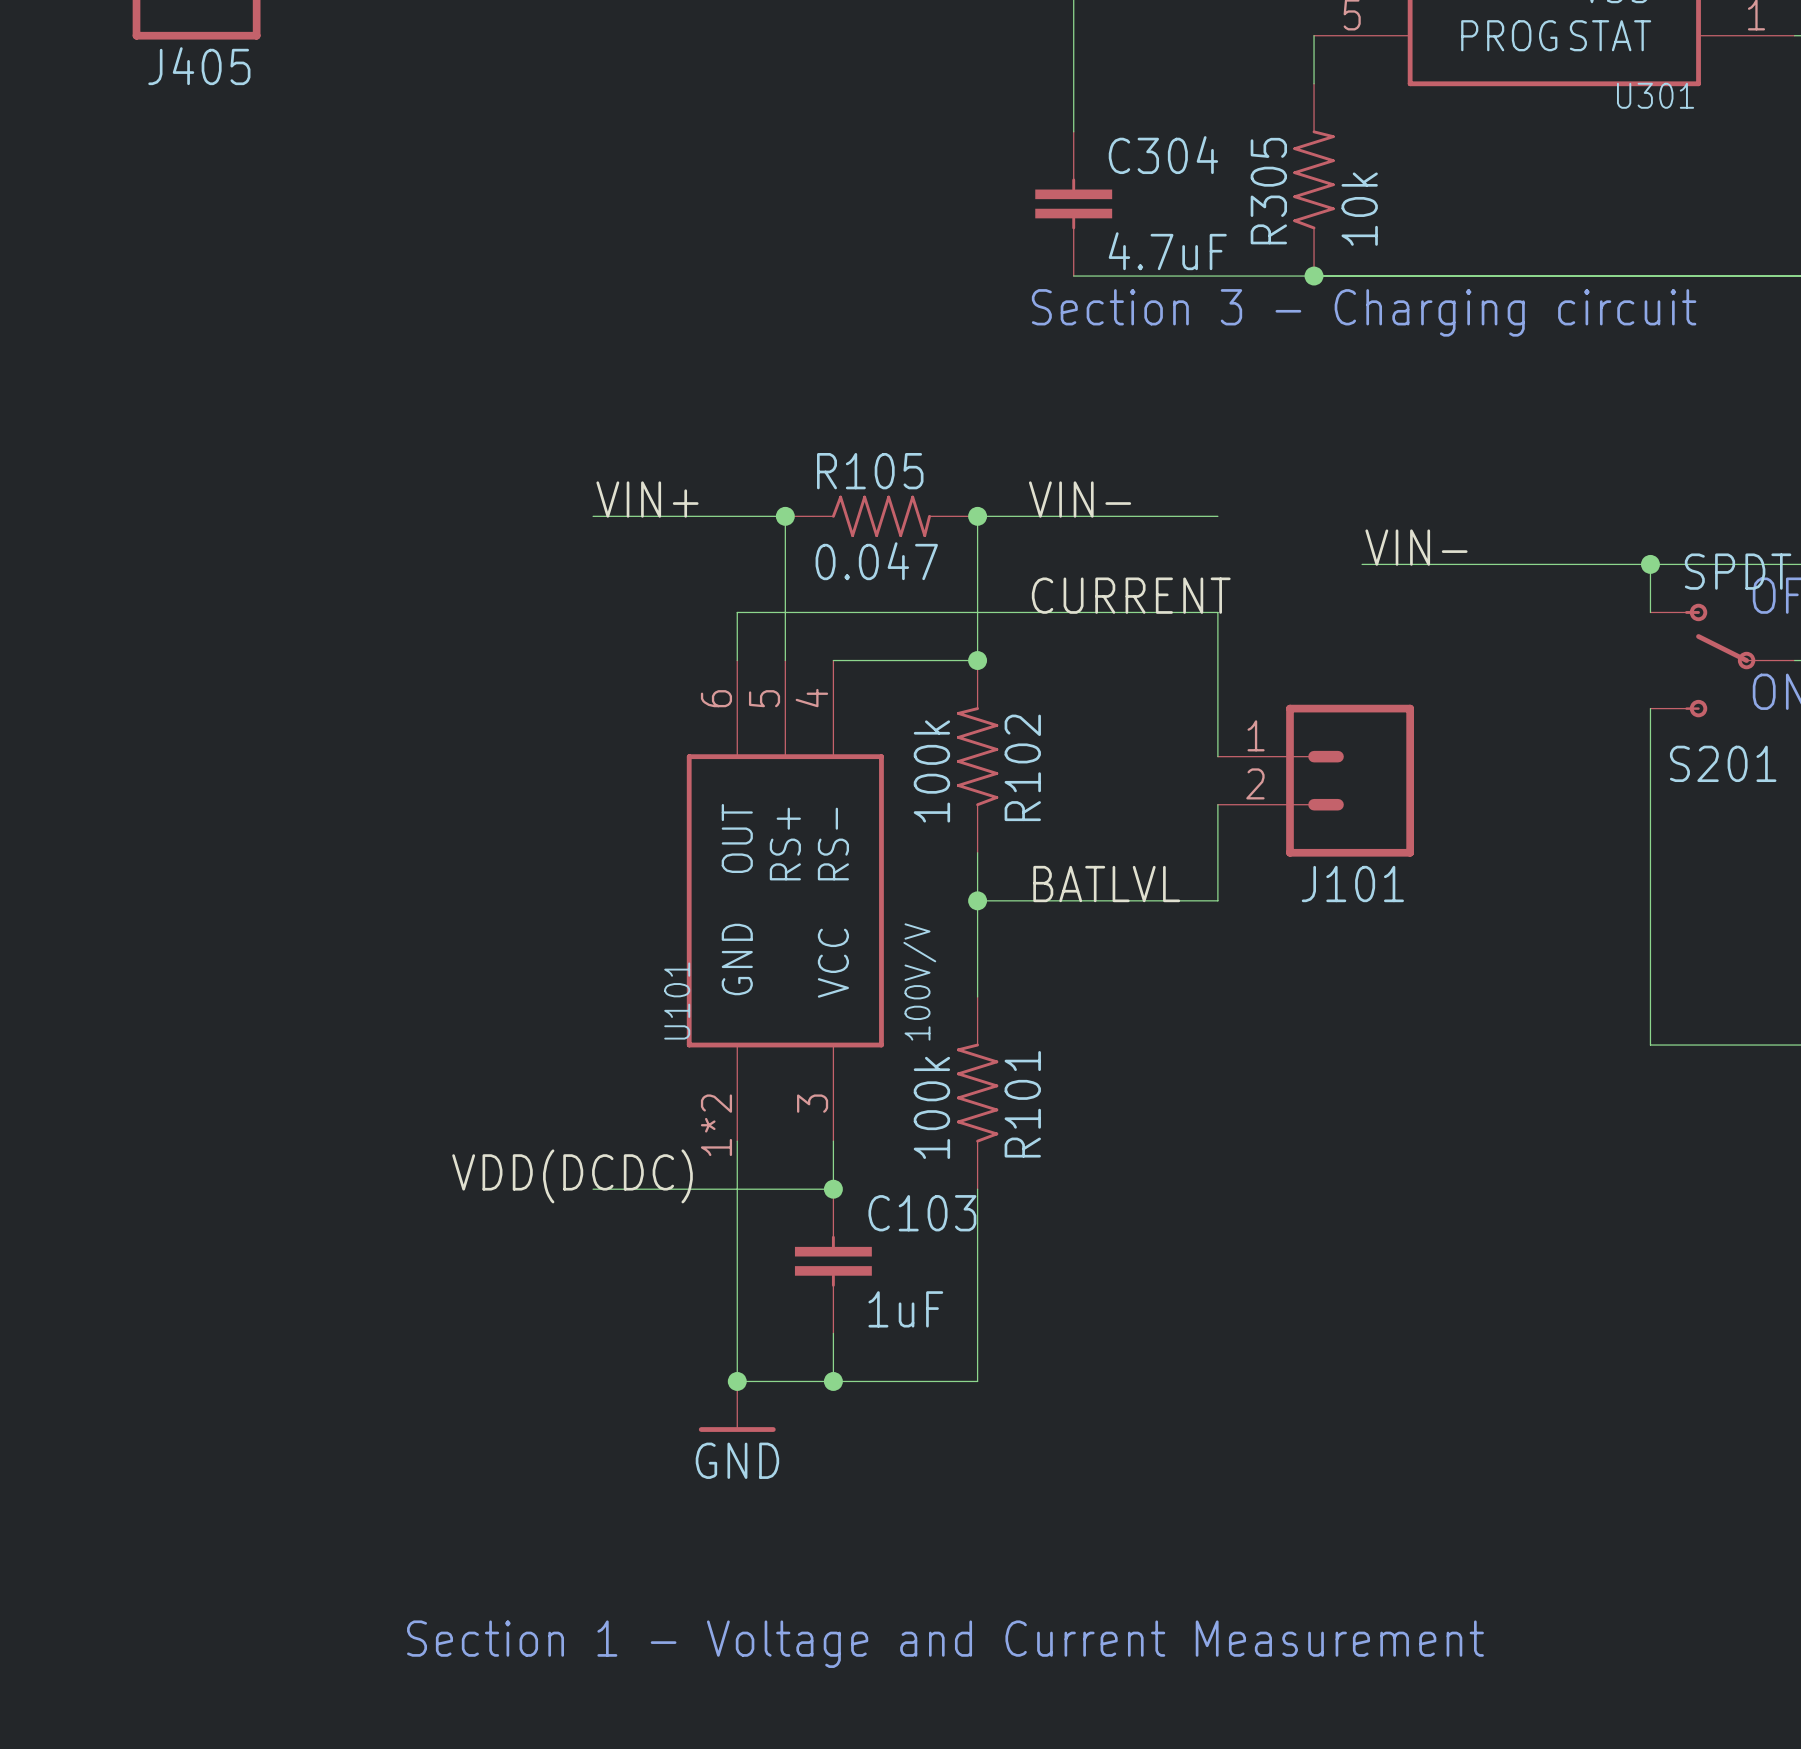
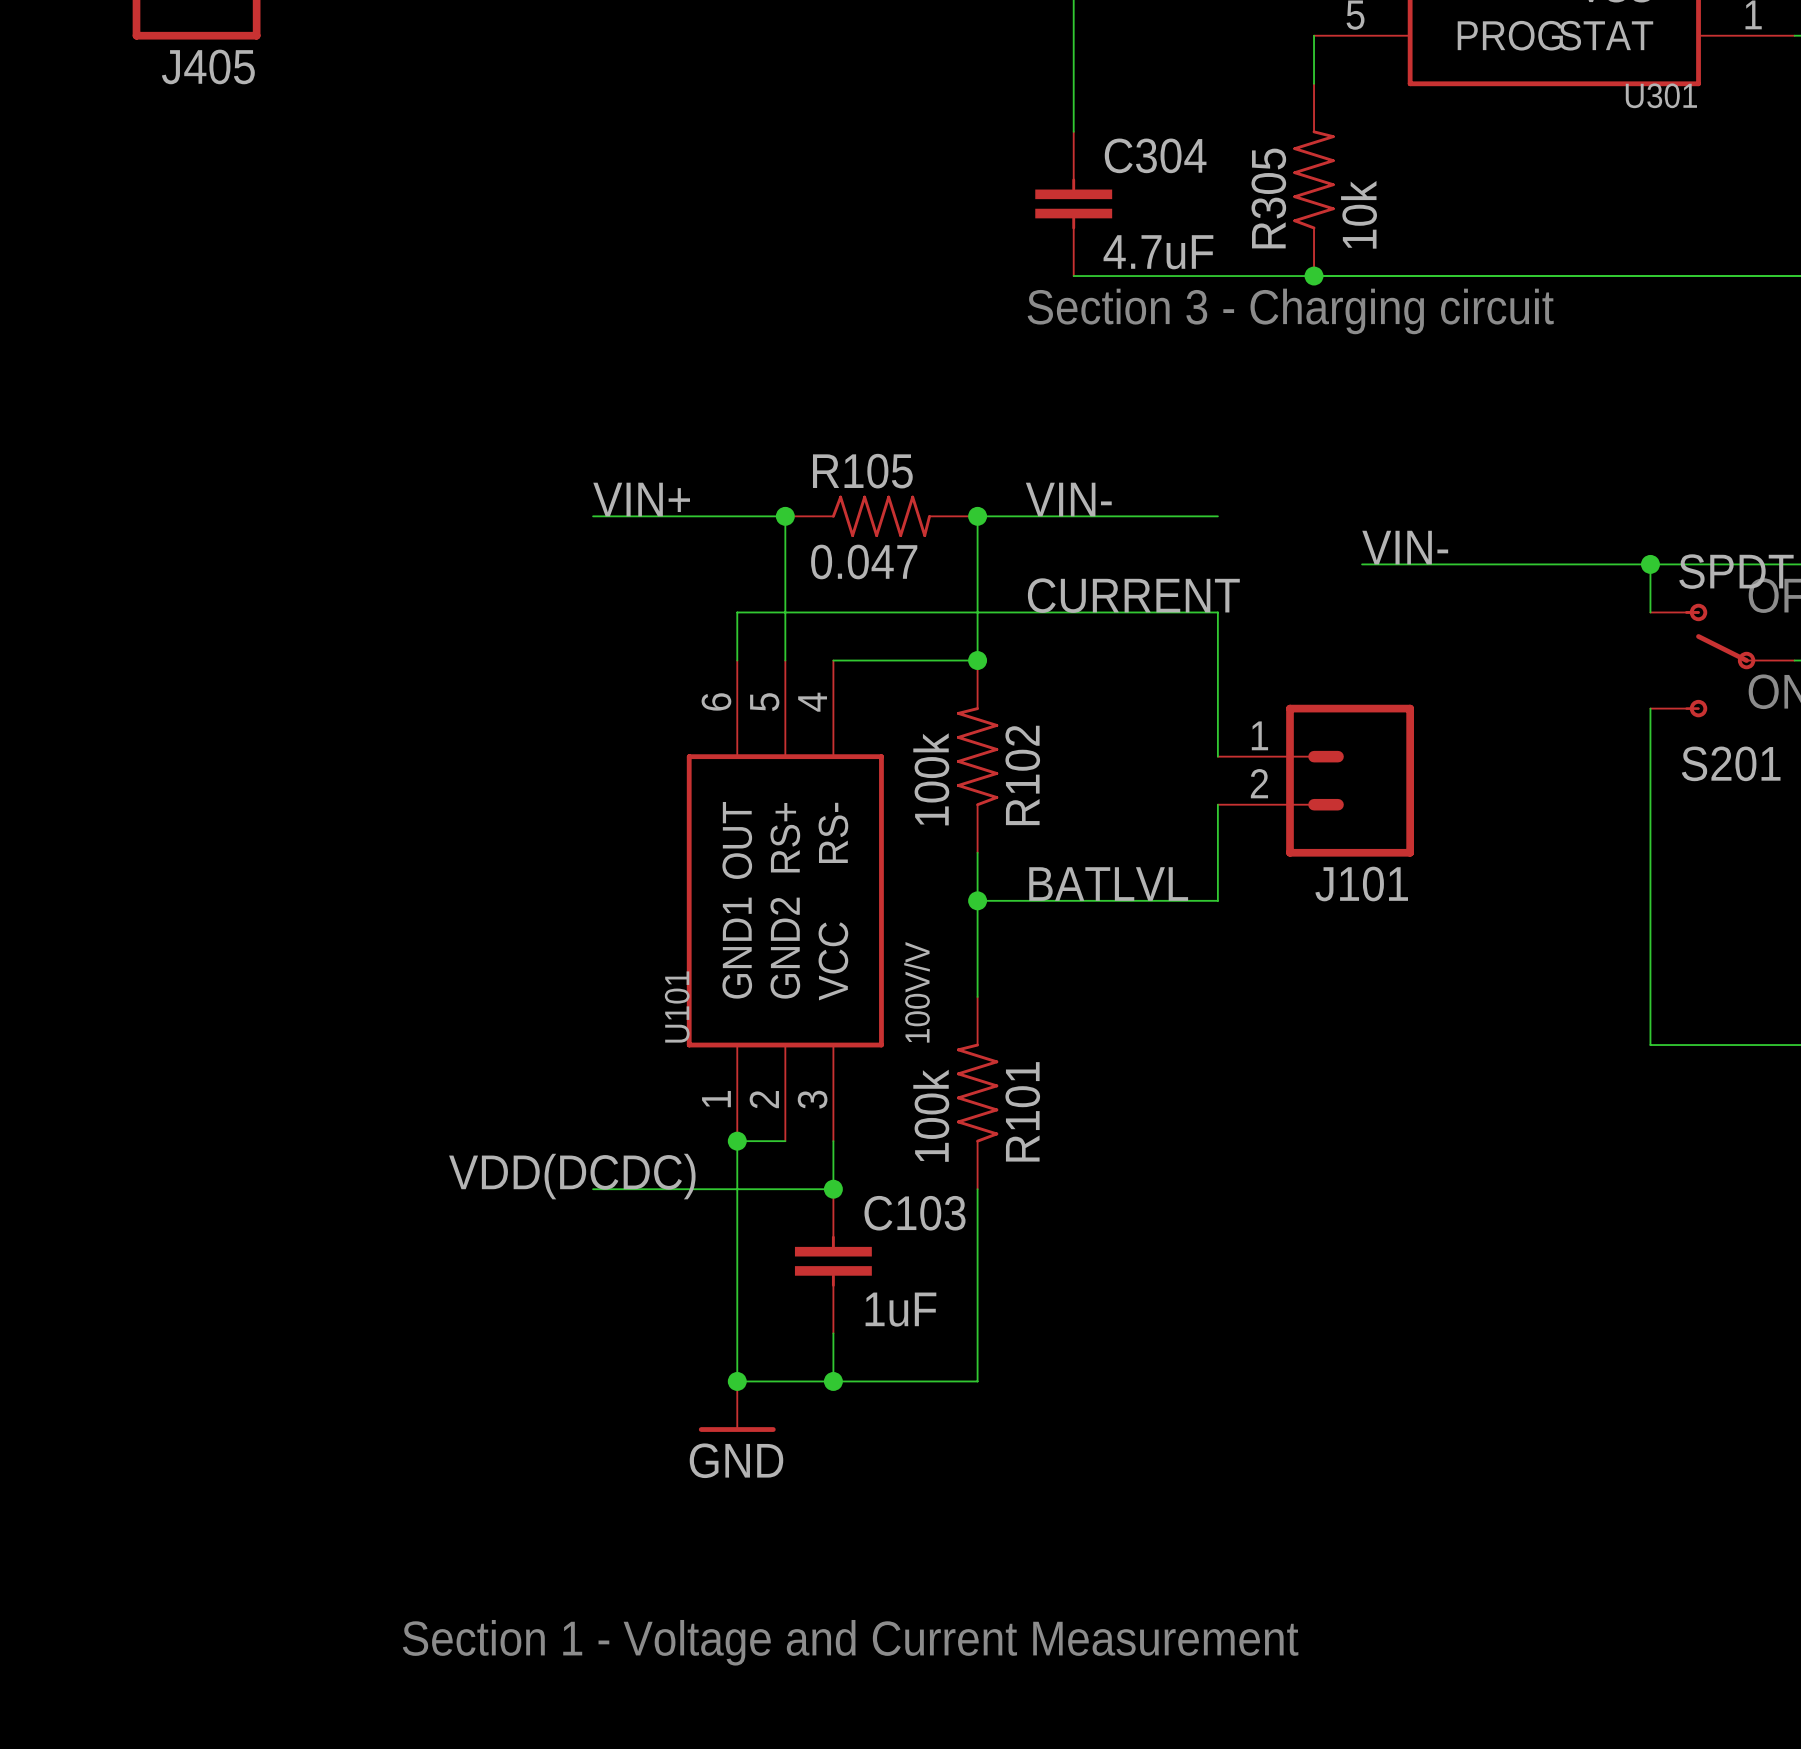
U101 symbol: [686, 660, 884, 1142] -> [686, 660, 884, 1142]
wire: none -> (737, 1141) (785, 1141)
junction: none -> (737, 1141)

